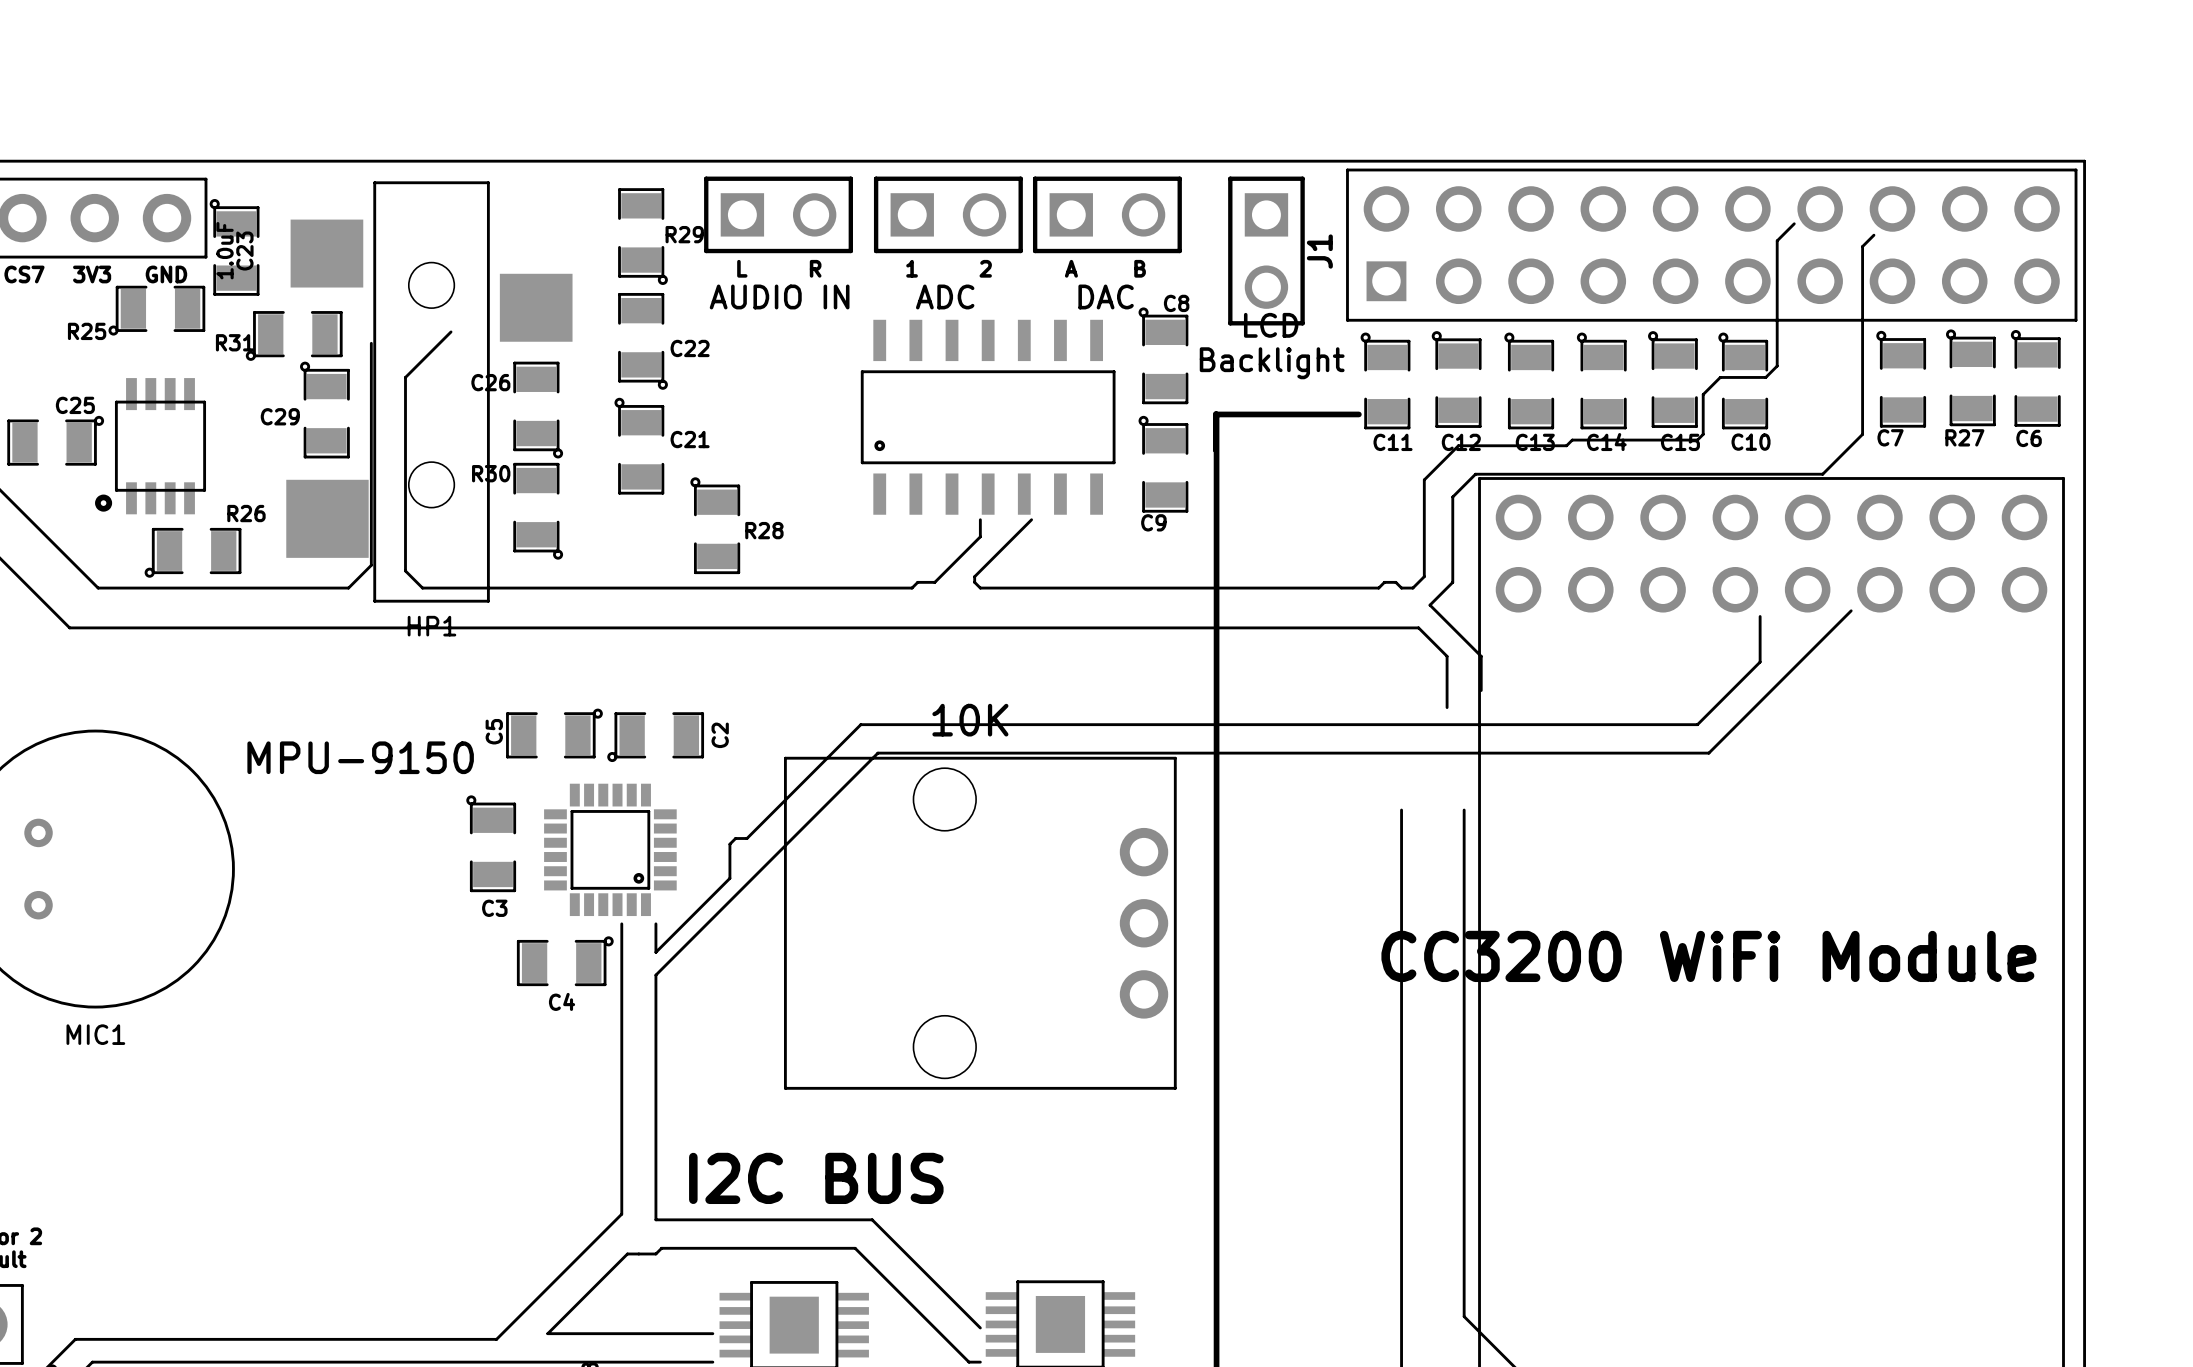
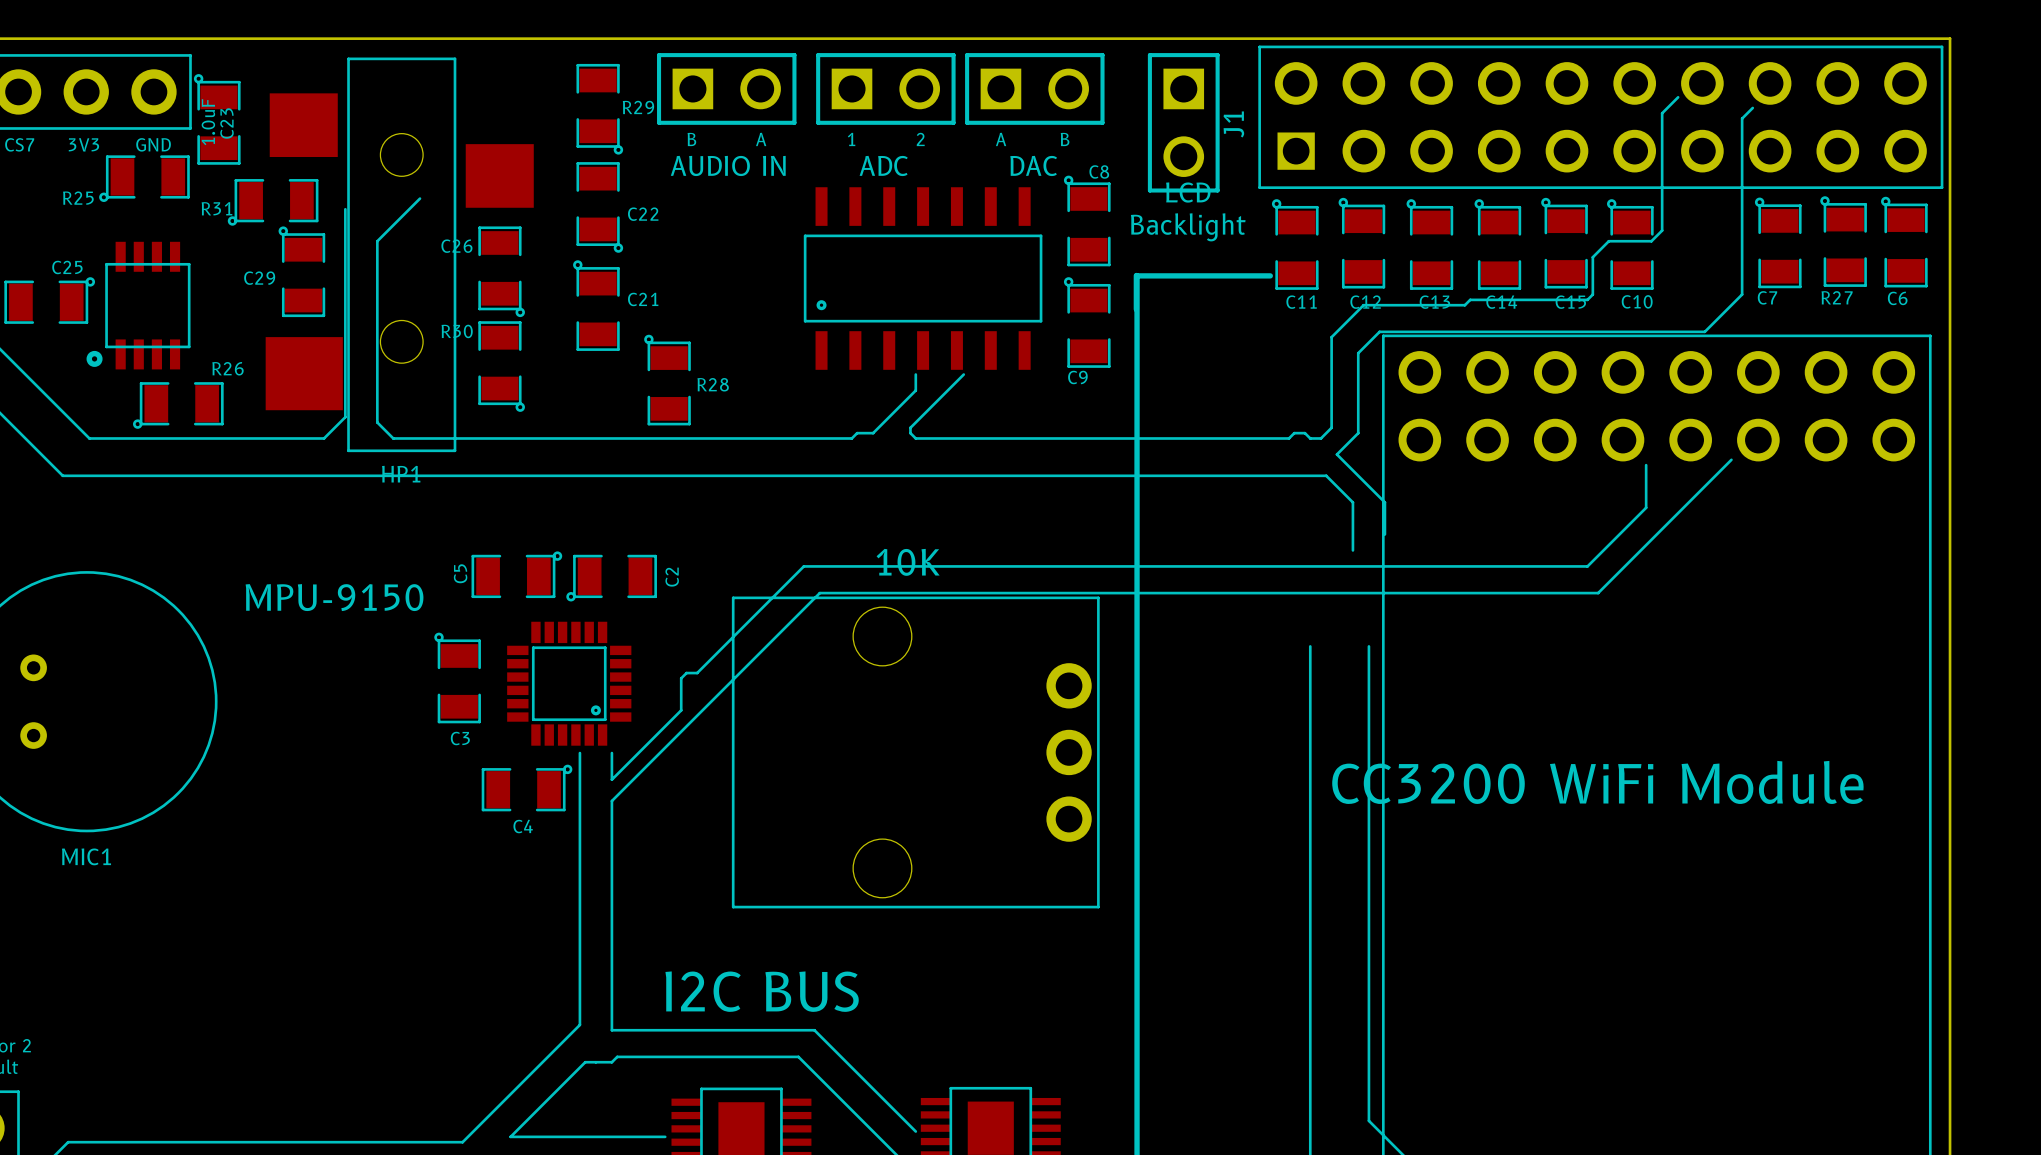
text: L (742, 268) -> B (691, 139)
text: R (815, 268) -> A (761, 139)

